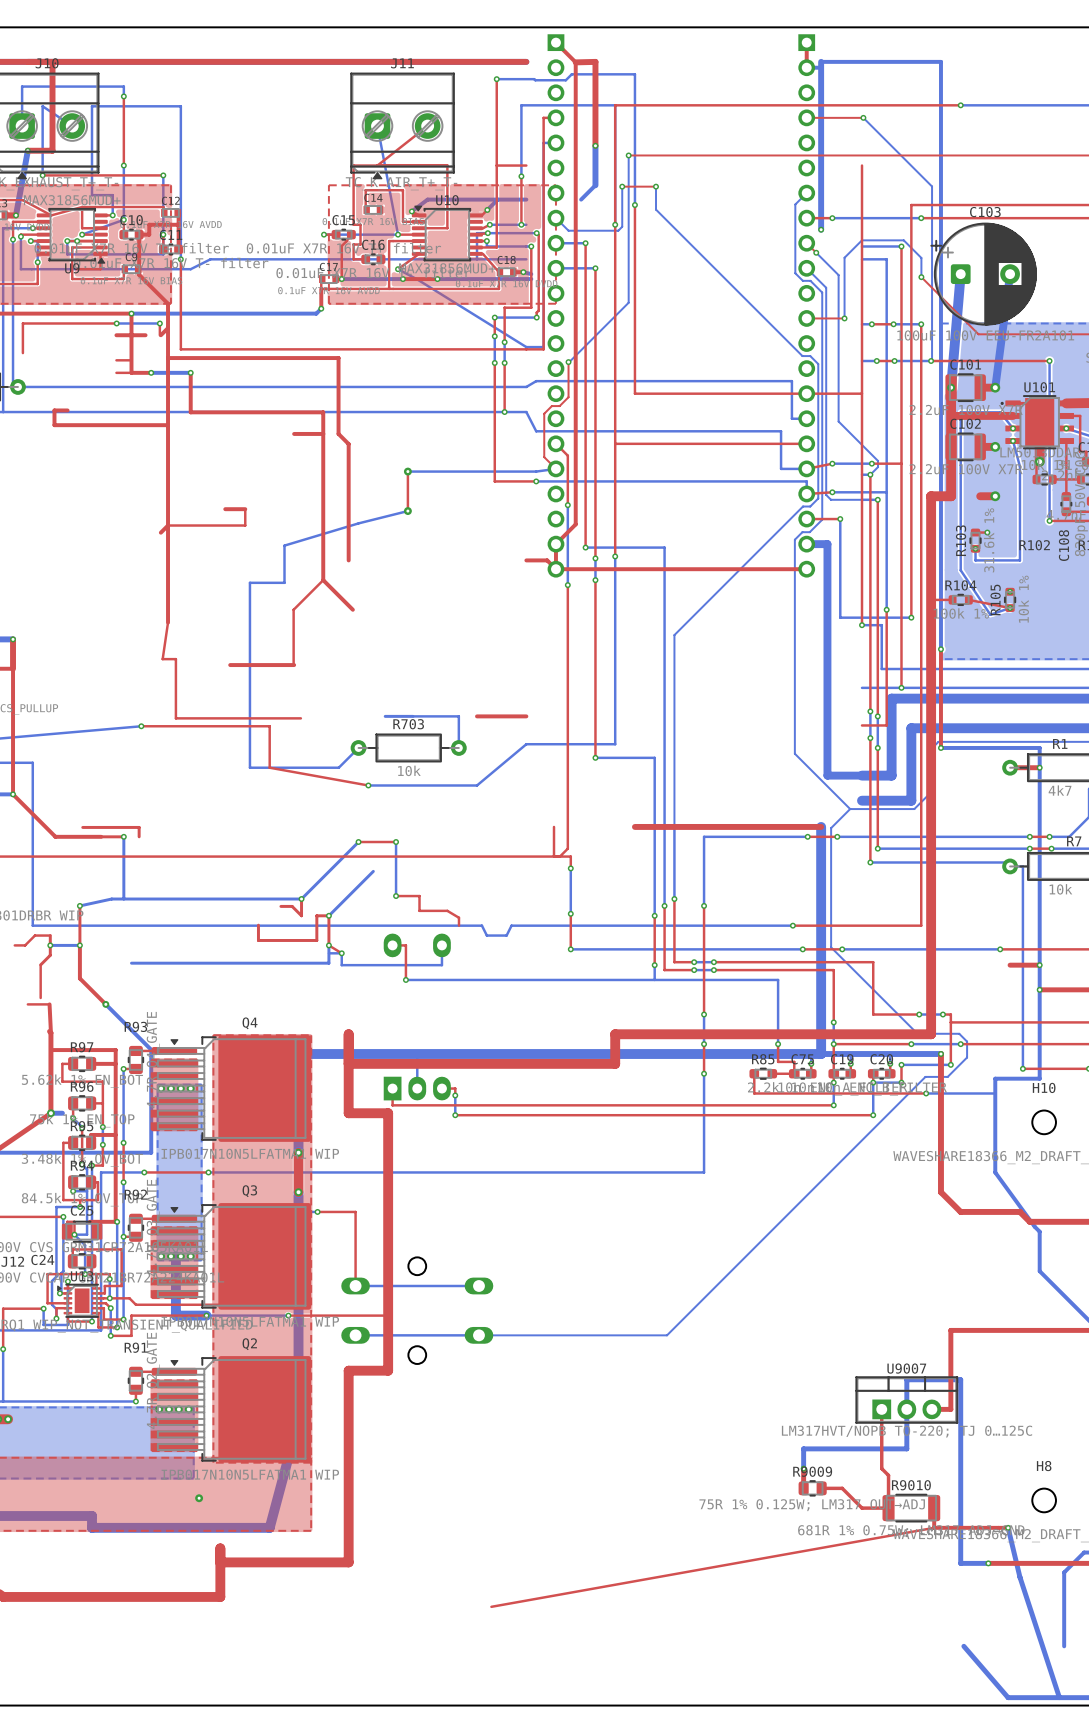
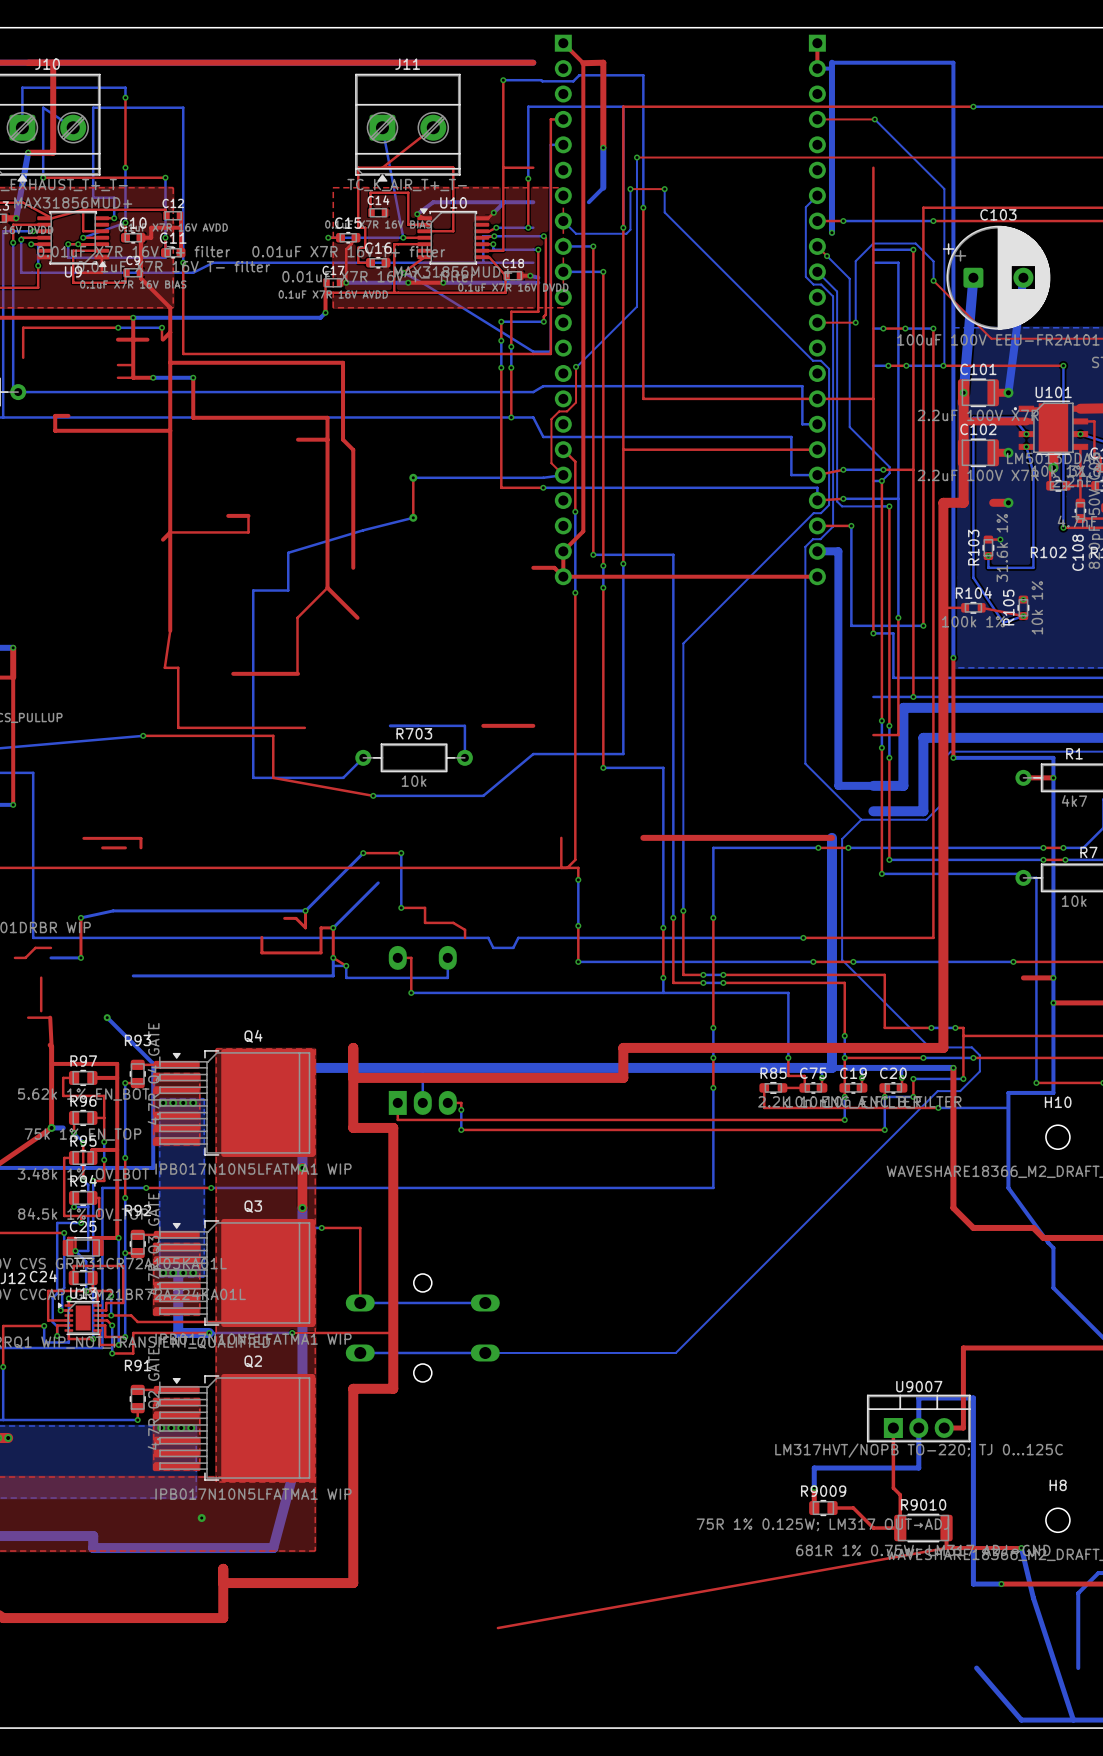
top track: (13, 794) (55, 836) (101, 836) -> none
bottom track: (123, 836) (123, 899) -> none
via: (123, 836) -> none
top track: (50, 935) (50, 955) (40, 964) -> none
via: (50, 945) -> none
top track: (79, 945) (79, 978) (105, 1004) -> none

